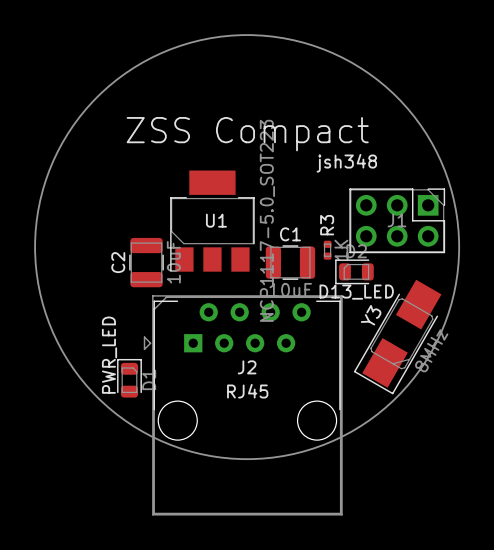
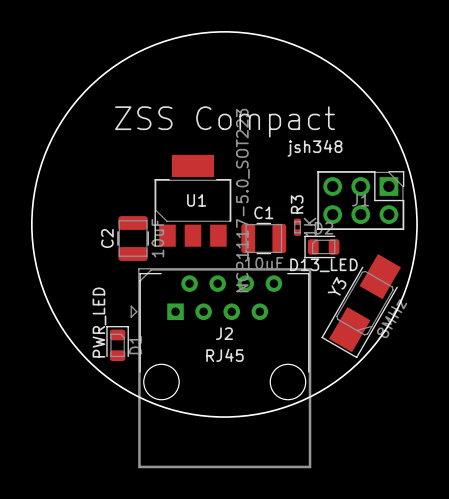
drawing: [34, 34, 461, 461] -> none
round board edge: none -> [31, 31, 418, 418]

